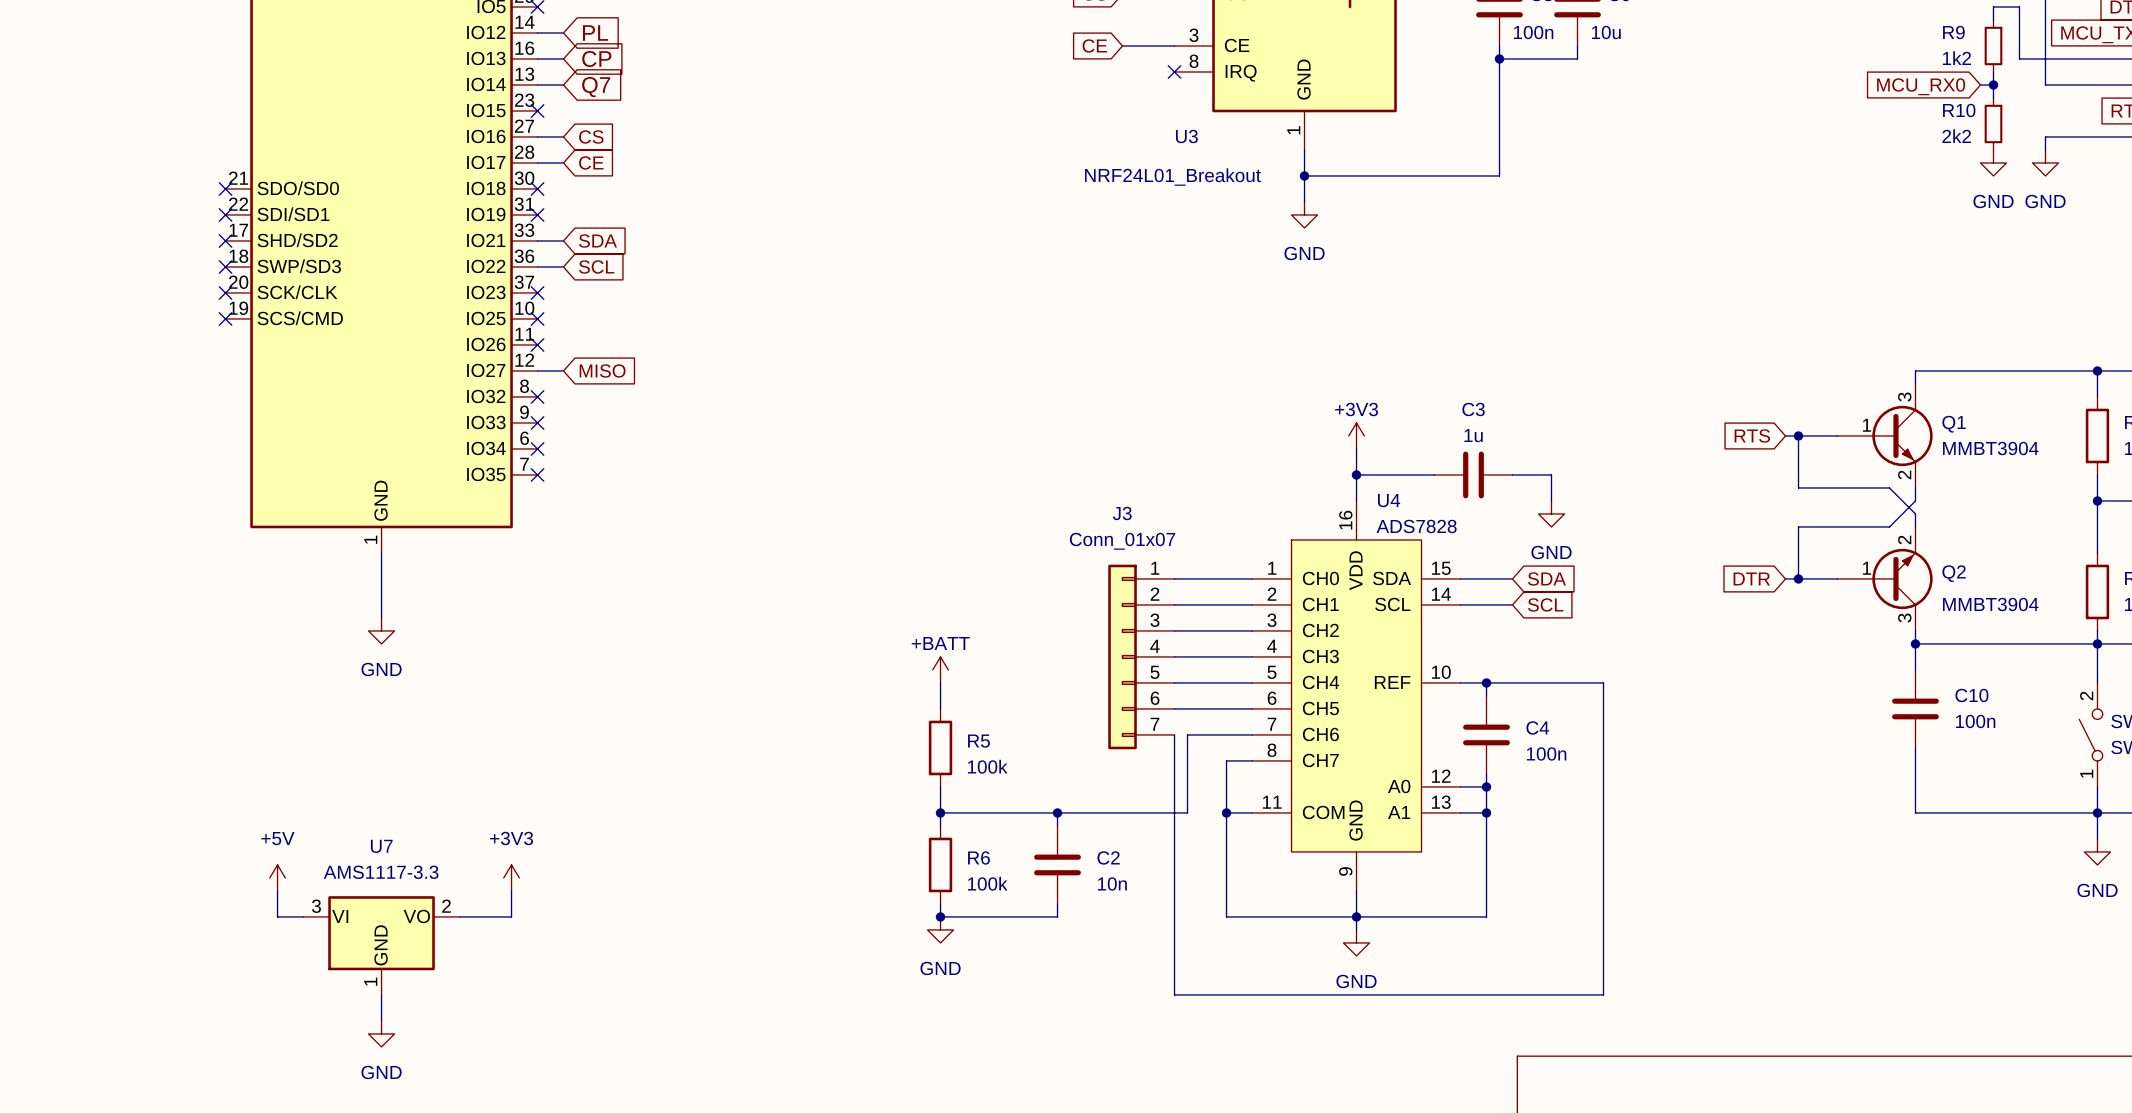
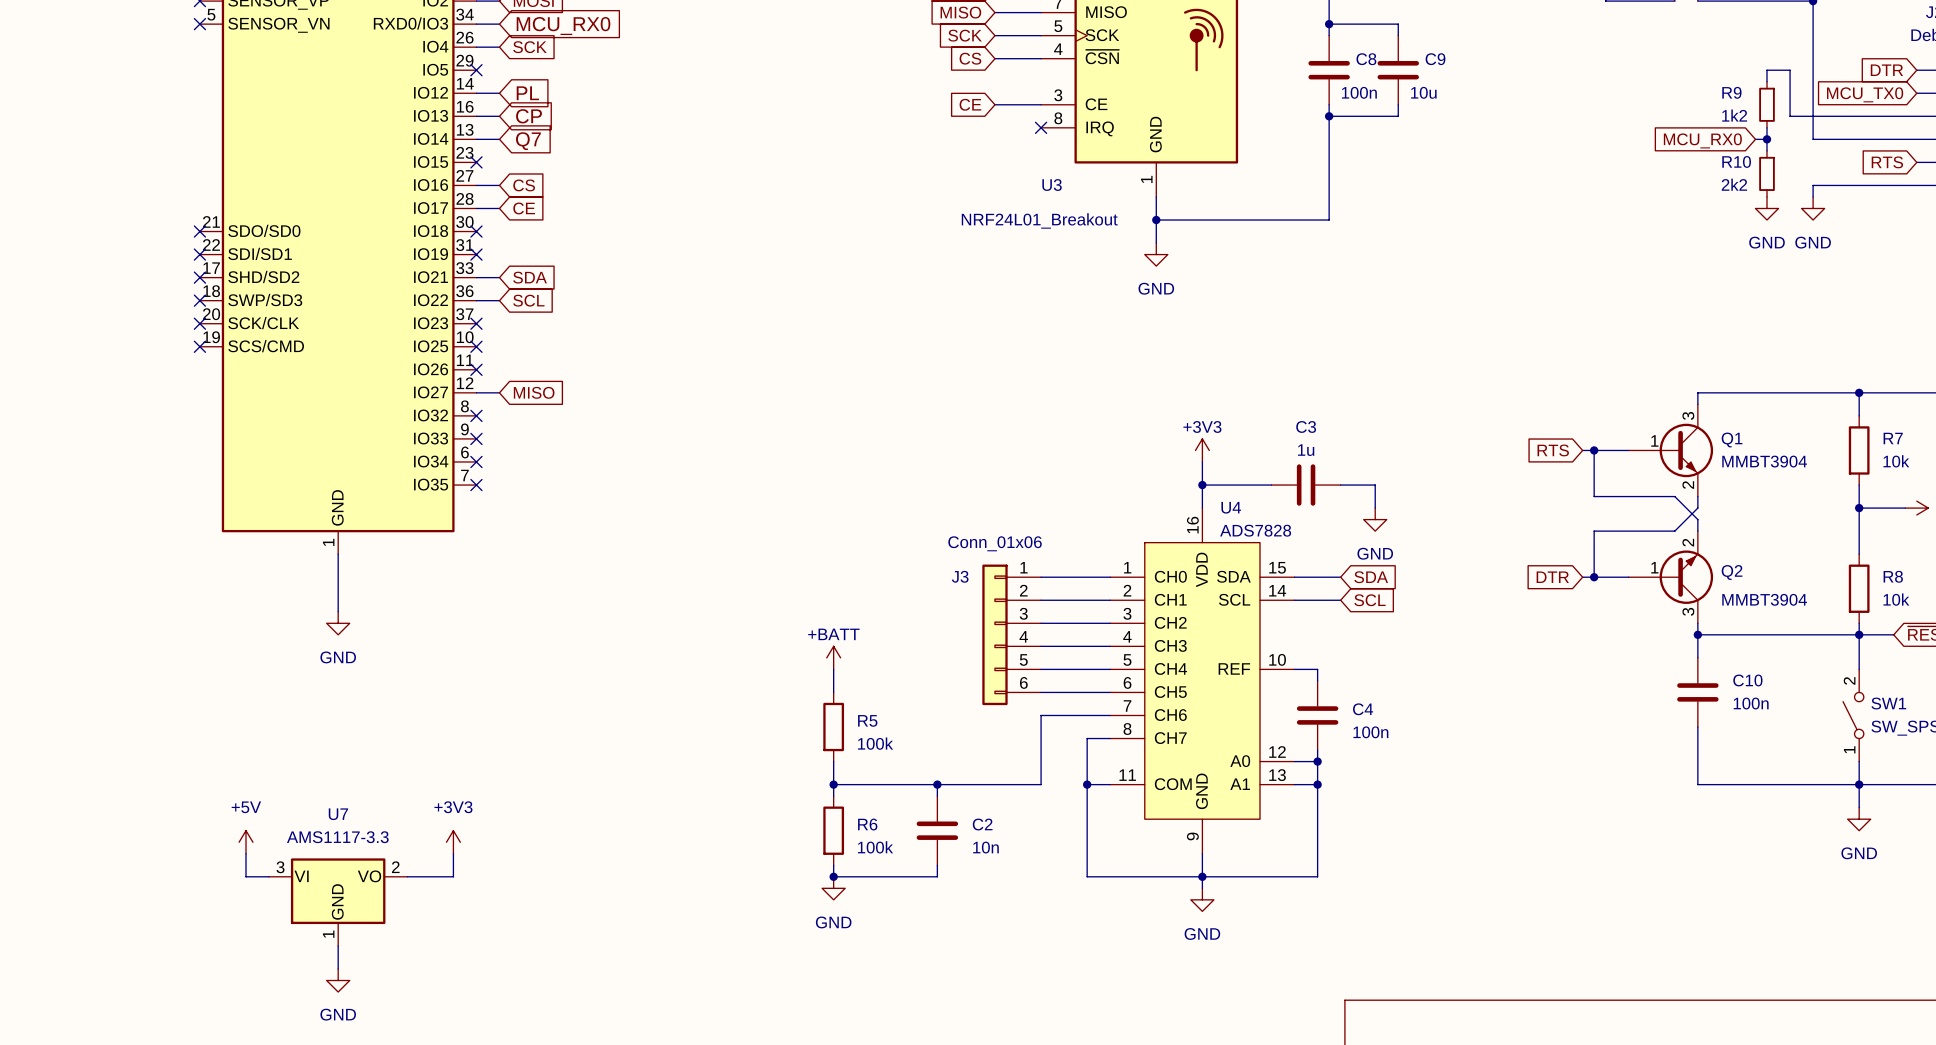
J3 name position: J3 (1122, 513) -> J3 (960, 576)
J3 value: Conn_01x07 (1122, 541) -> Conn_01x06 (995, 543)
J3 symbol: [1108, 564, 1175, 750] -> [982, 564, 1042, 706]
wire: (1486, 682) (1603, 682) (1603, 994) (1174, 994) (1174, 812) (1187, 812) (1187, 734) -> (1041, 715) (1052, 715)
junction: (1486, 682) -> none

